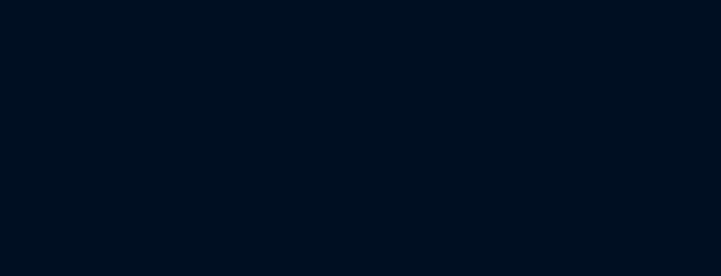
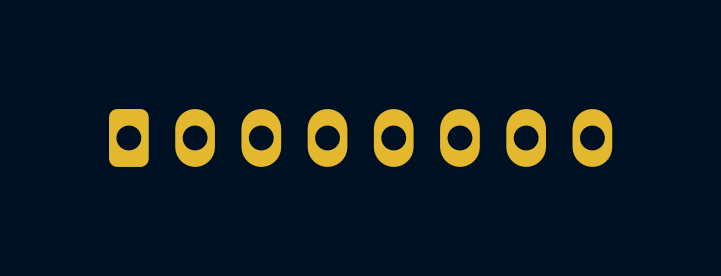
part: none -> (360, 137)

